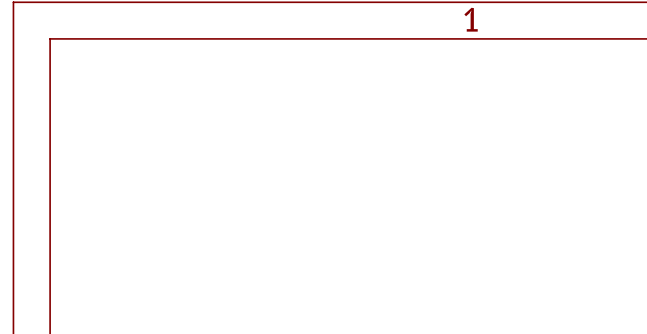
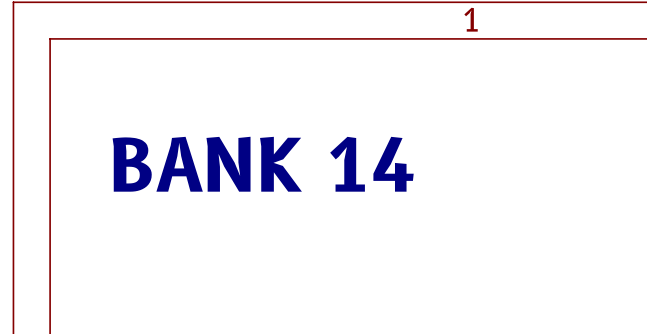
text: none -> BANK 14 (263, 164)

